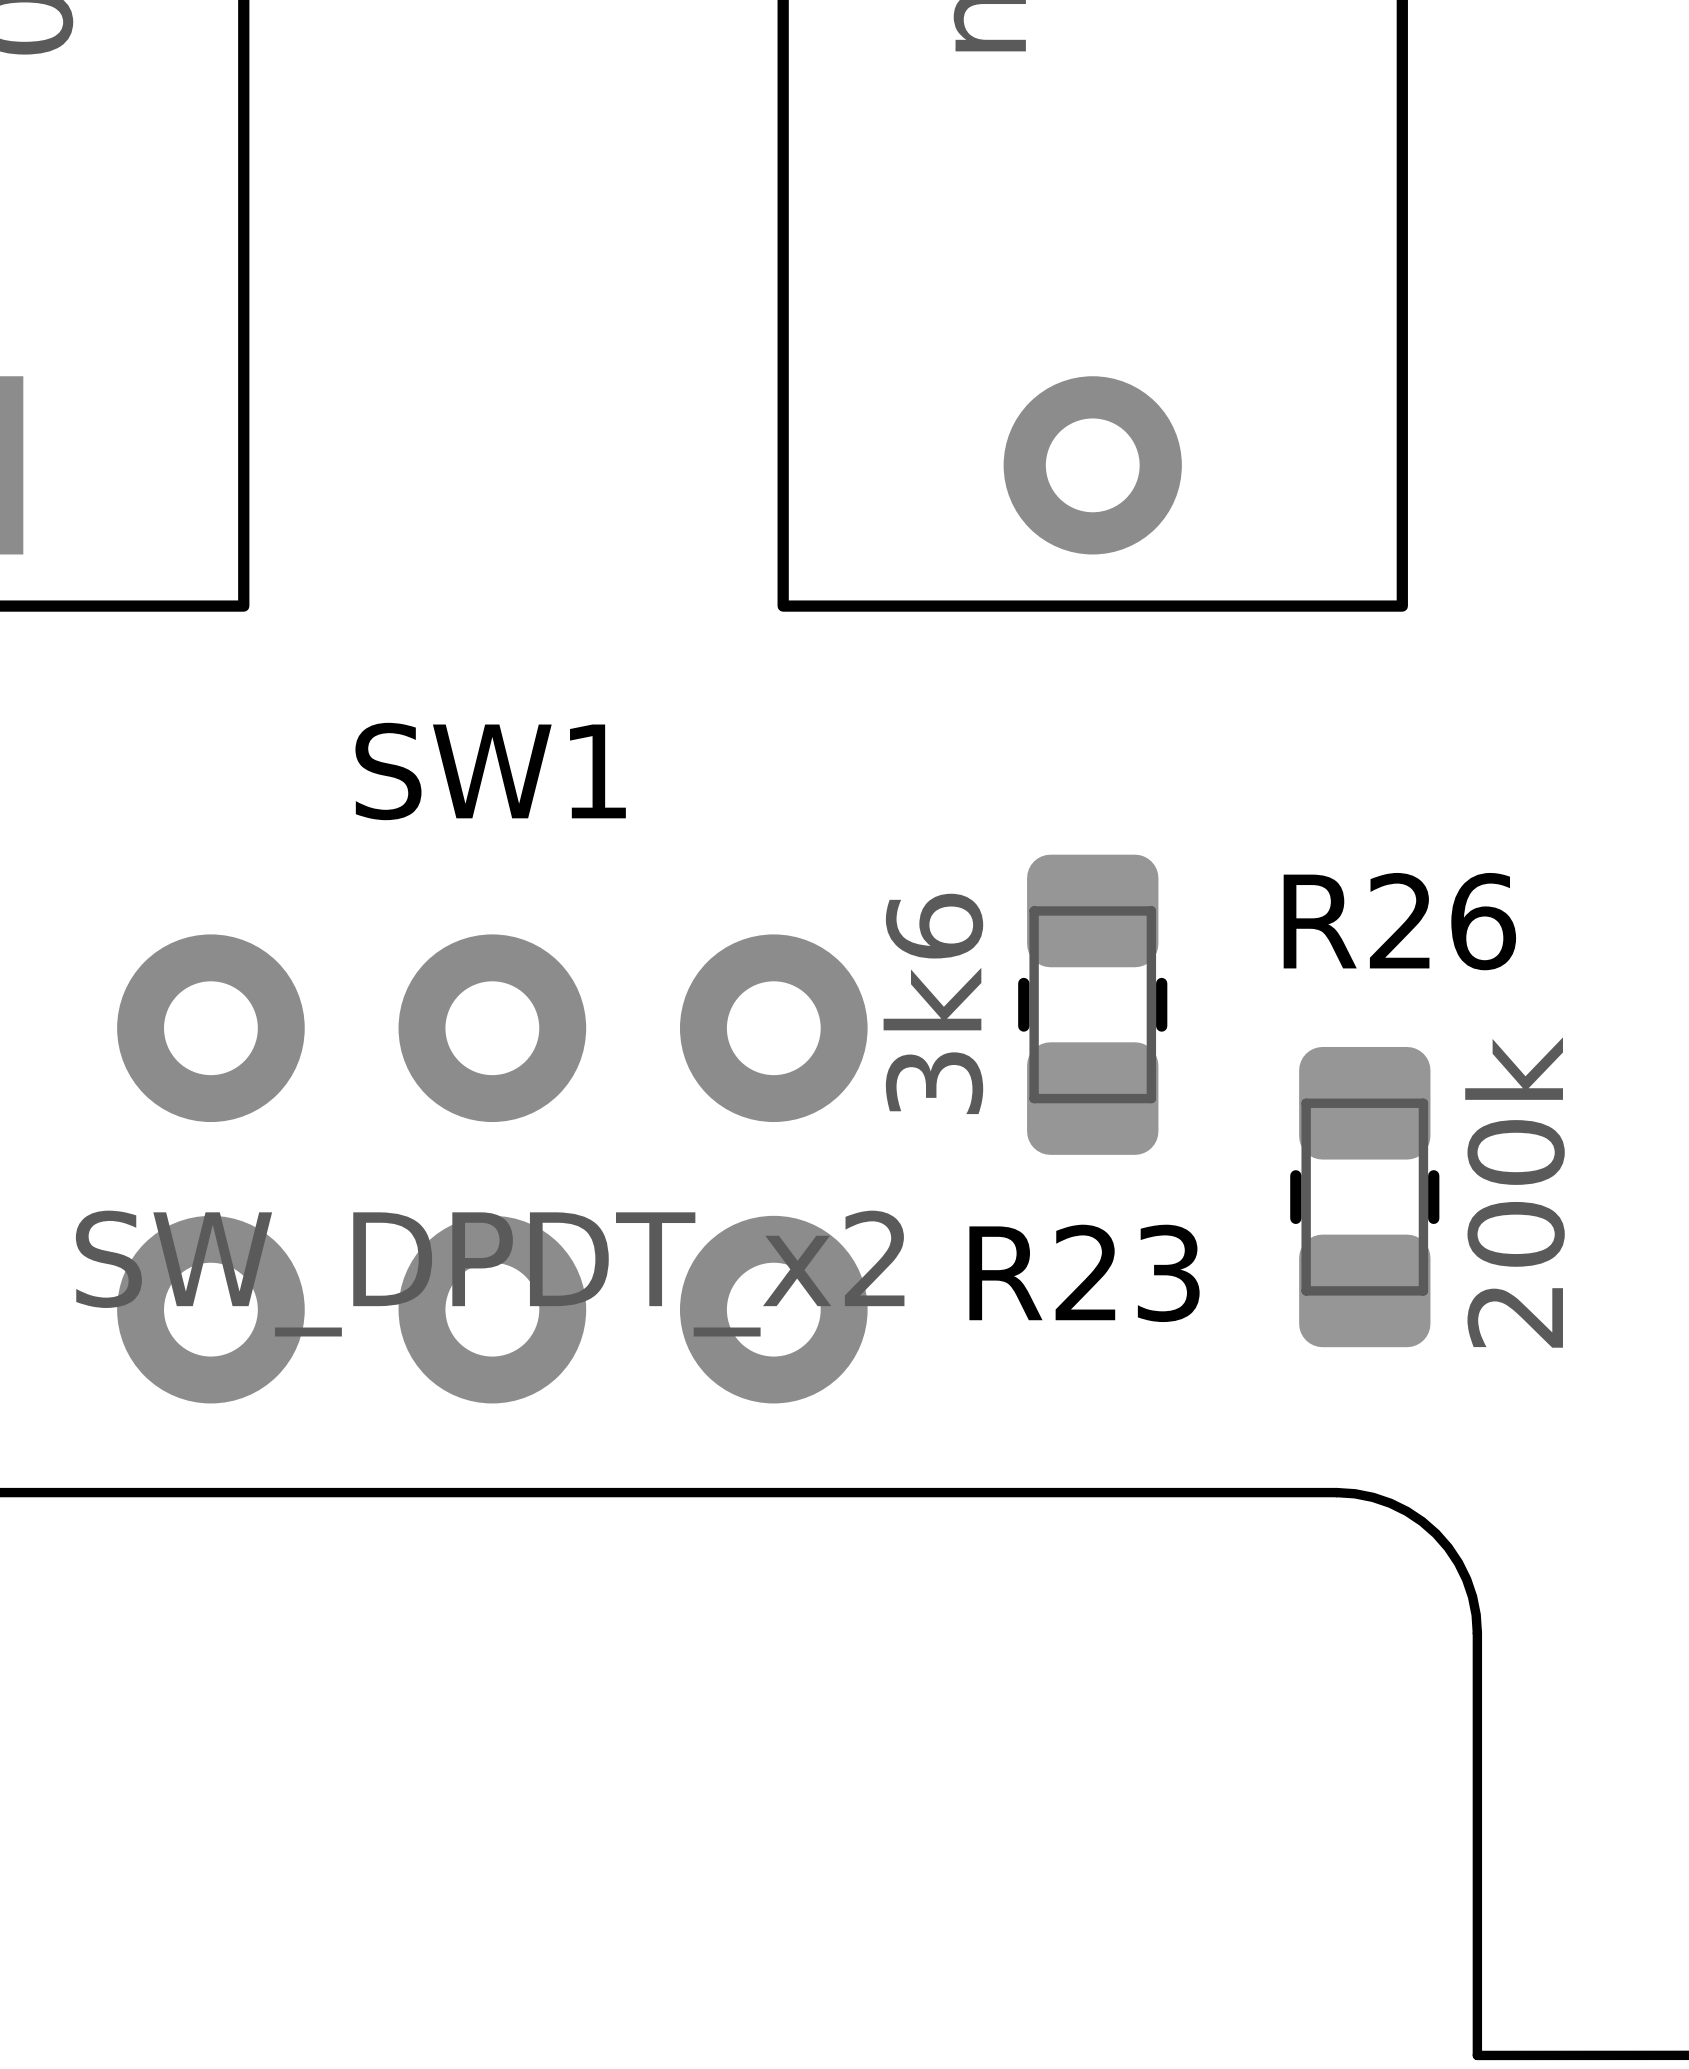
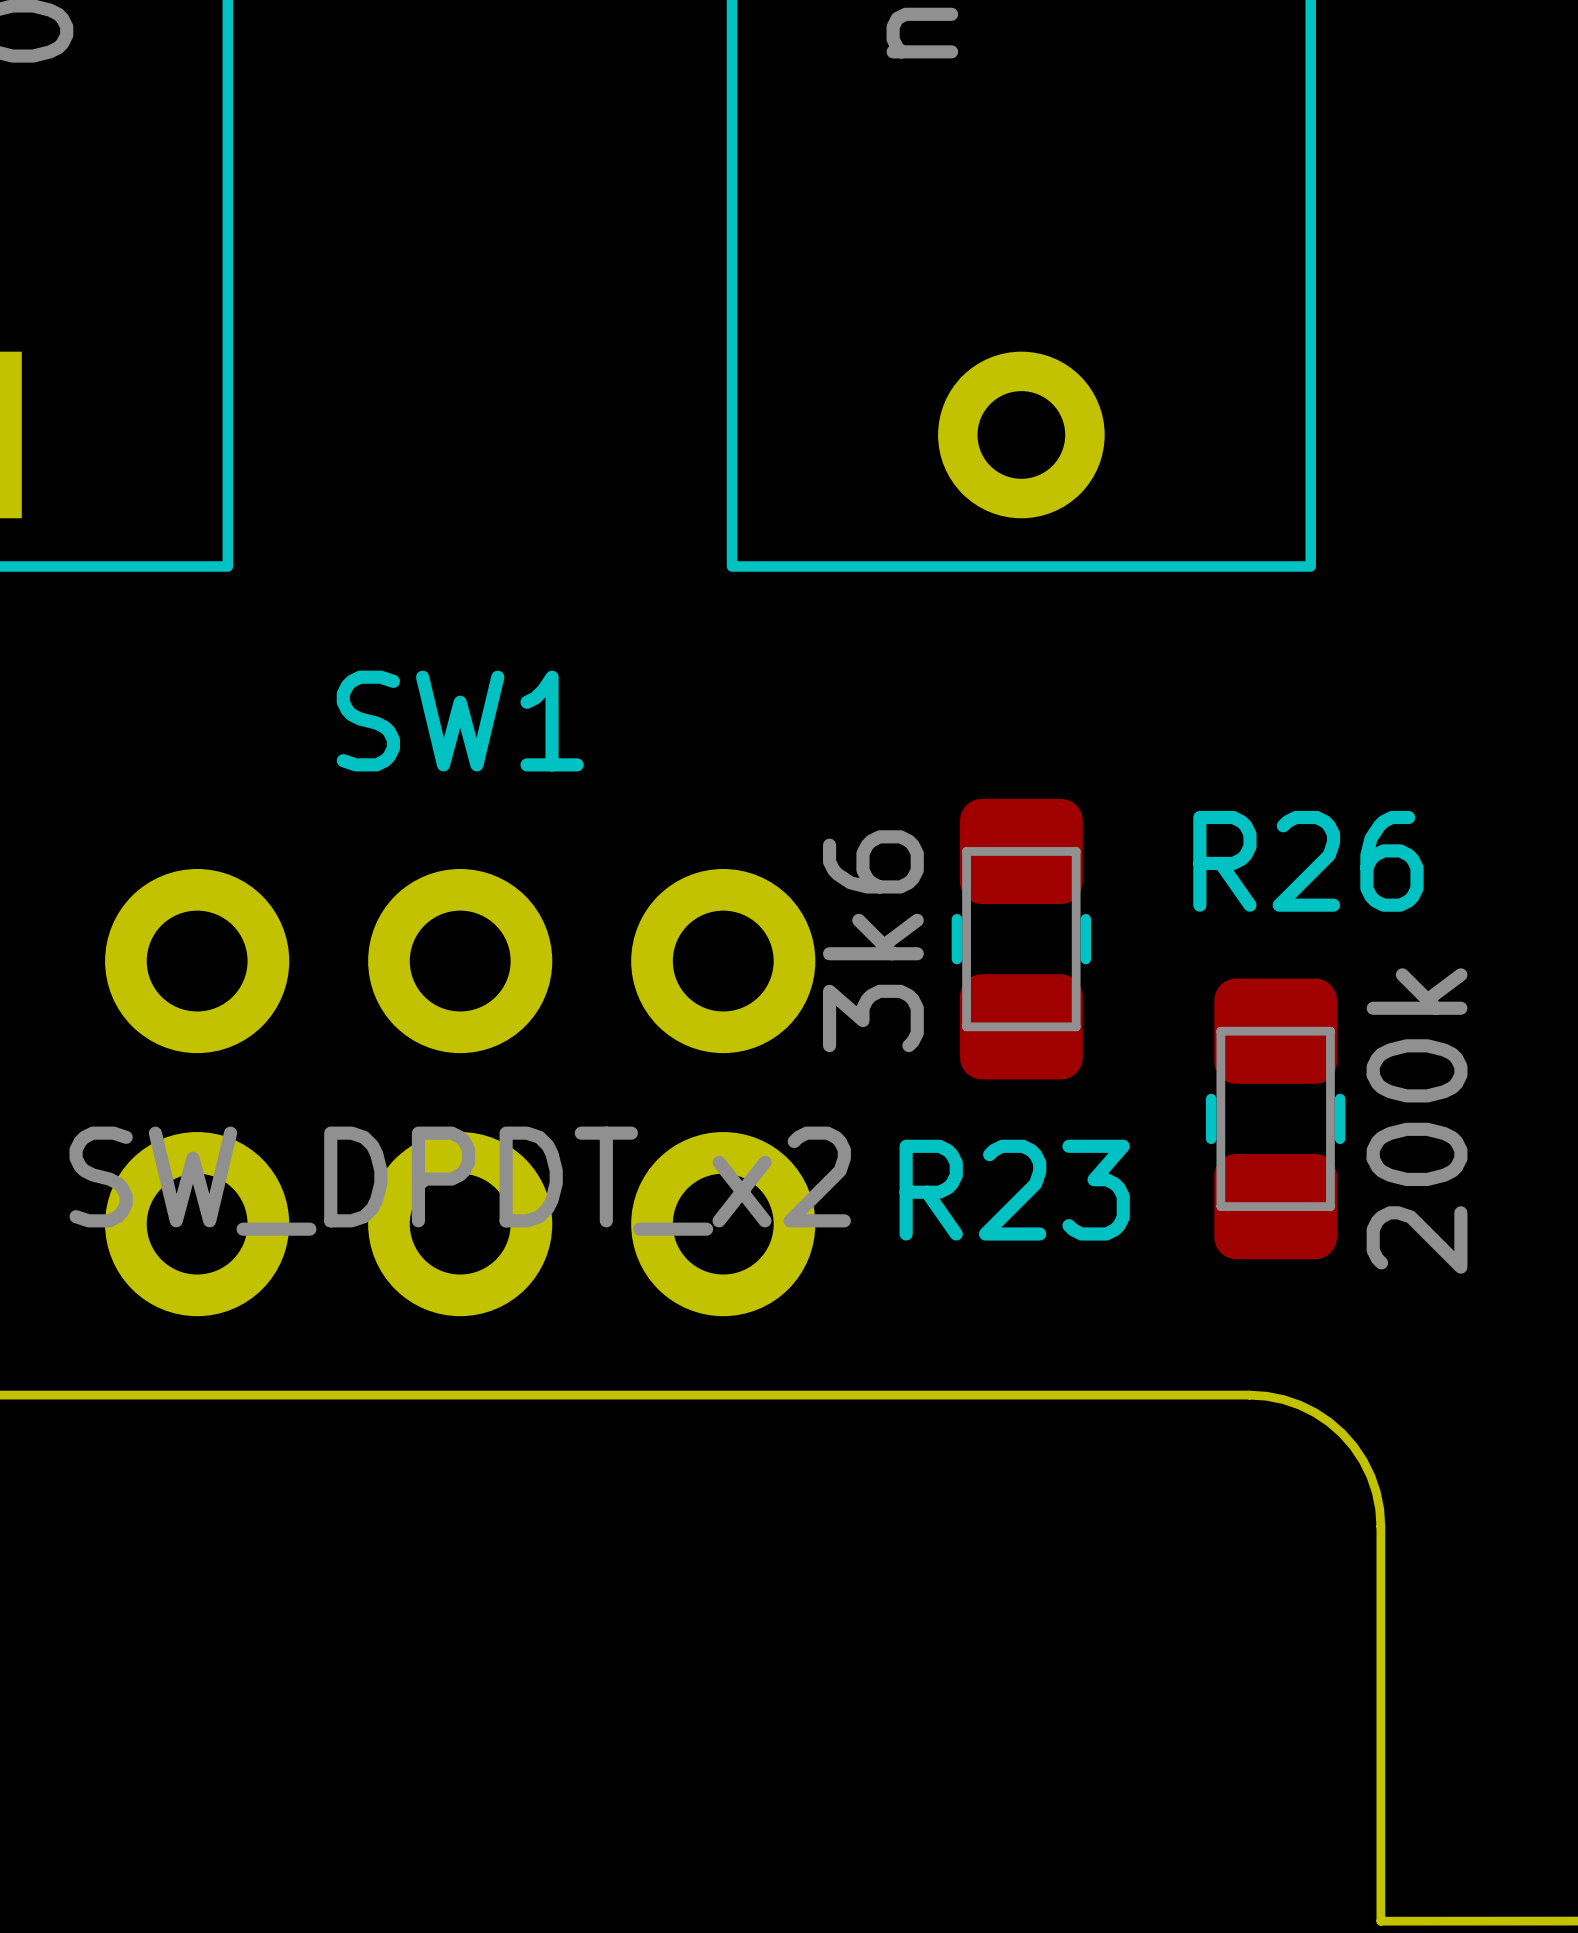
SW1 footprint: [117, 934, 868, 1404] -> [105, 868, 816, 1317]

